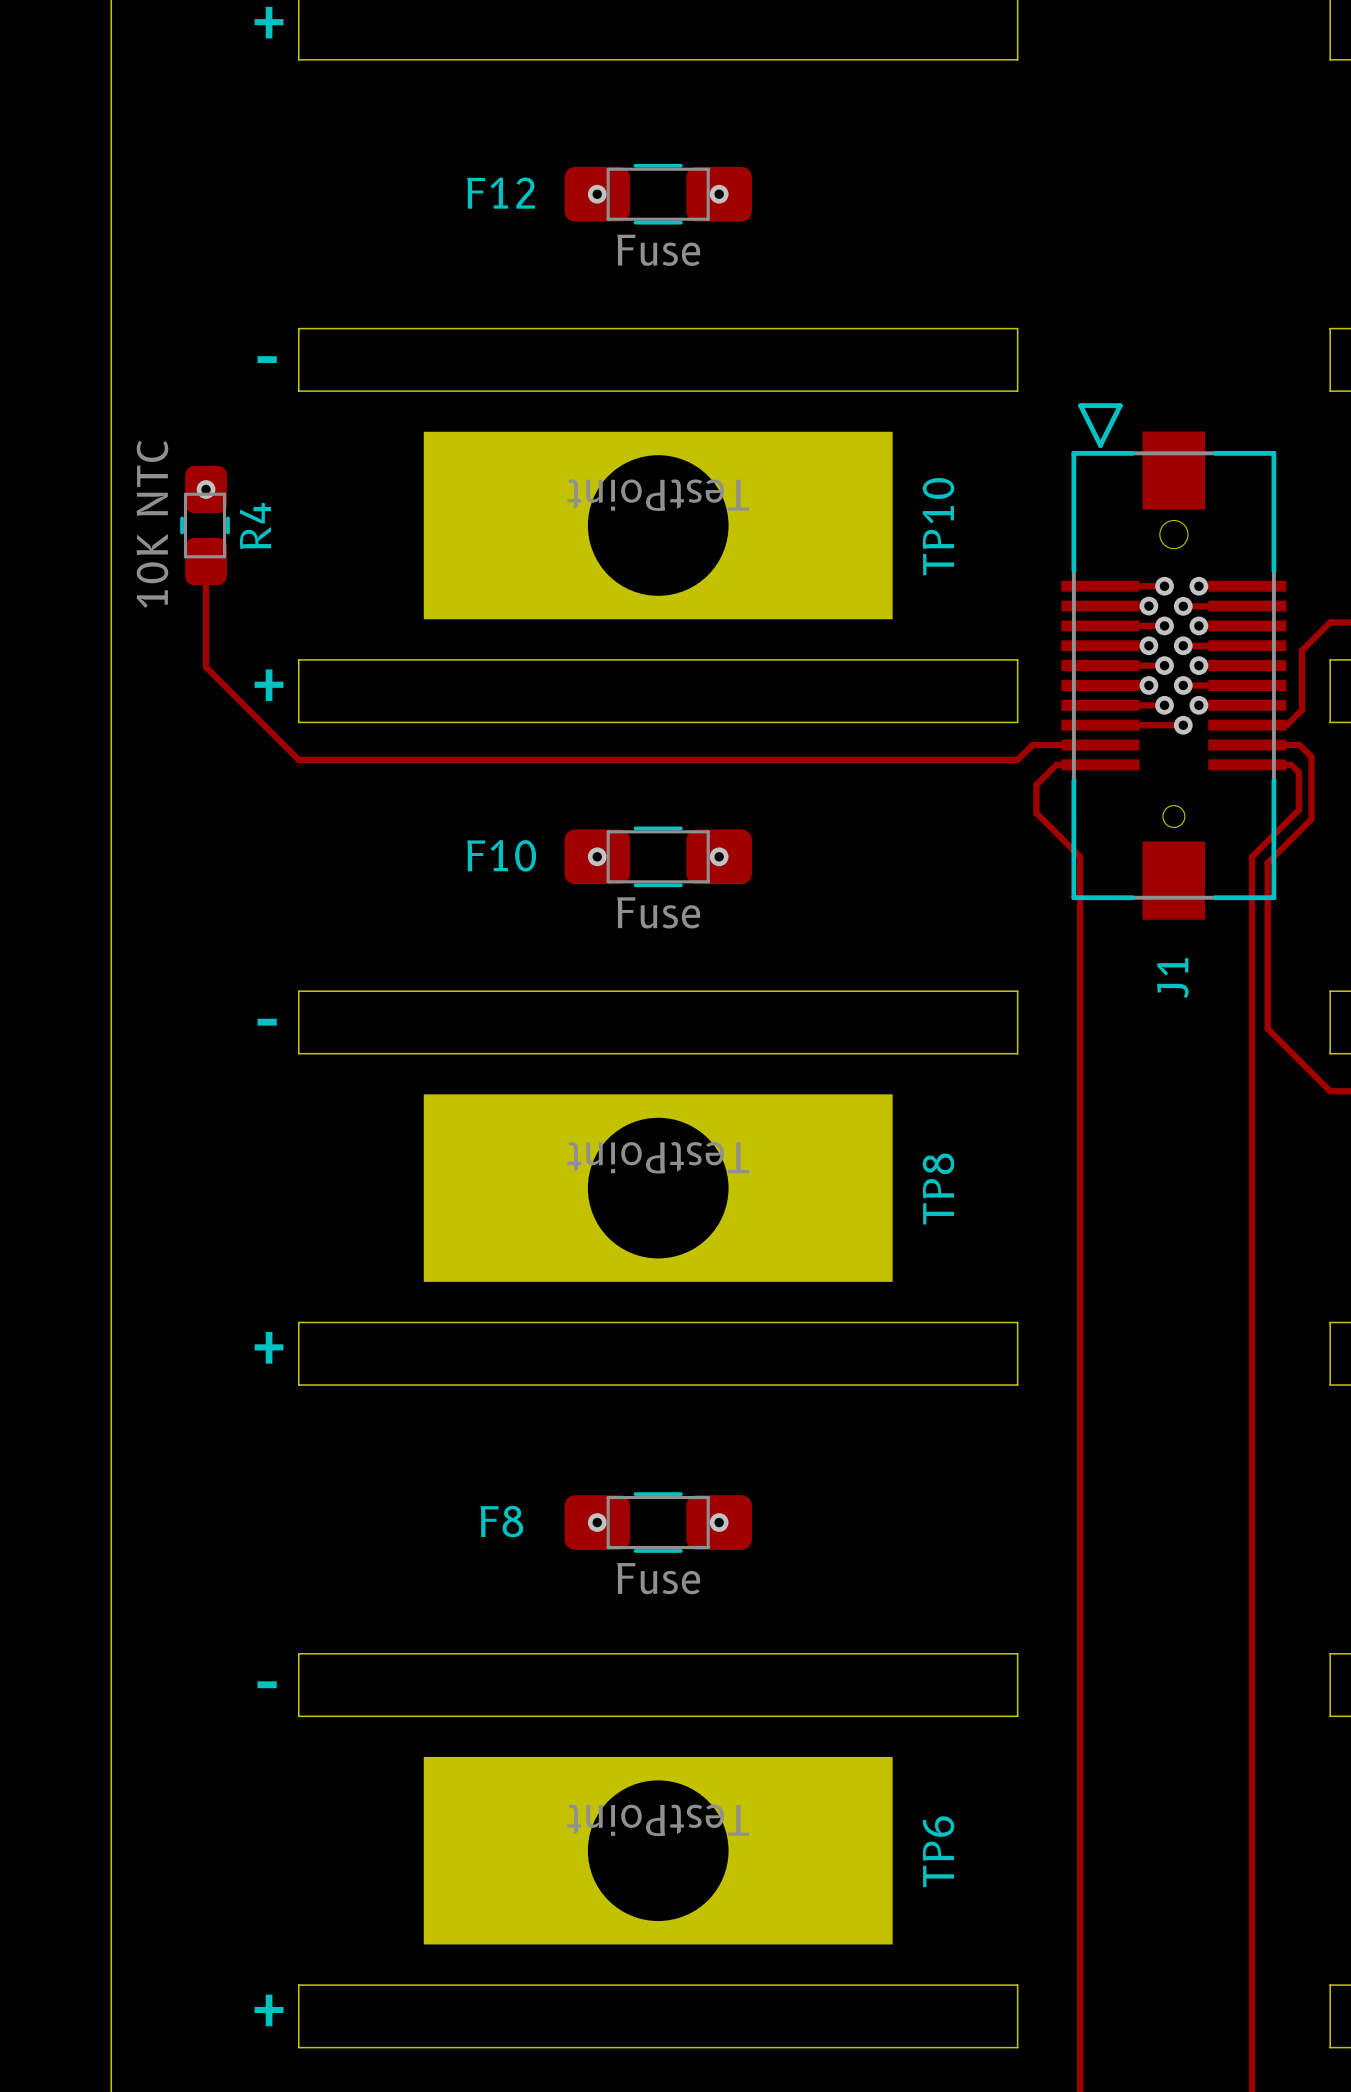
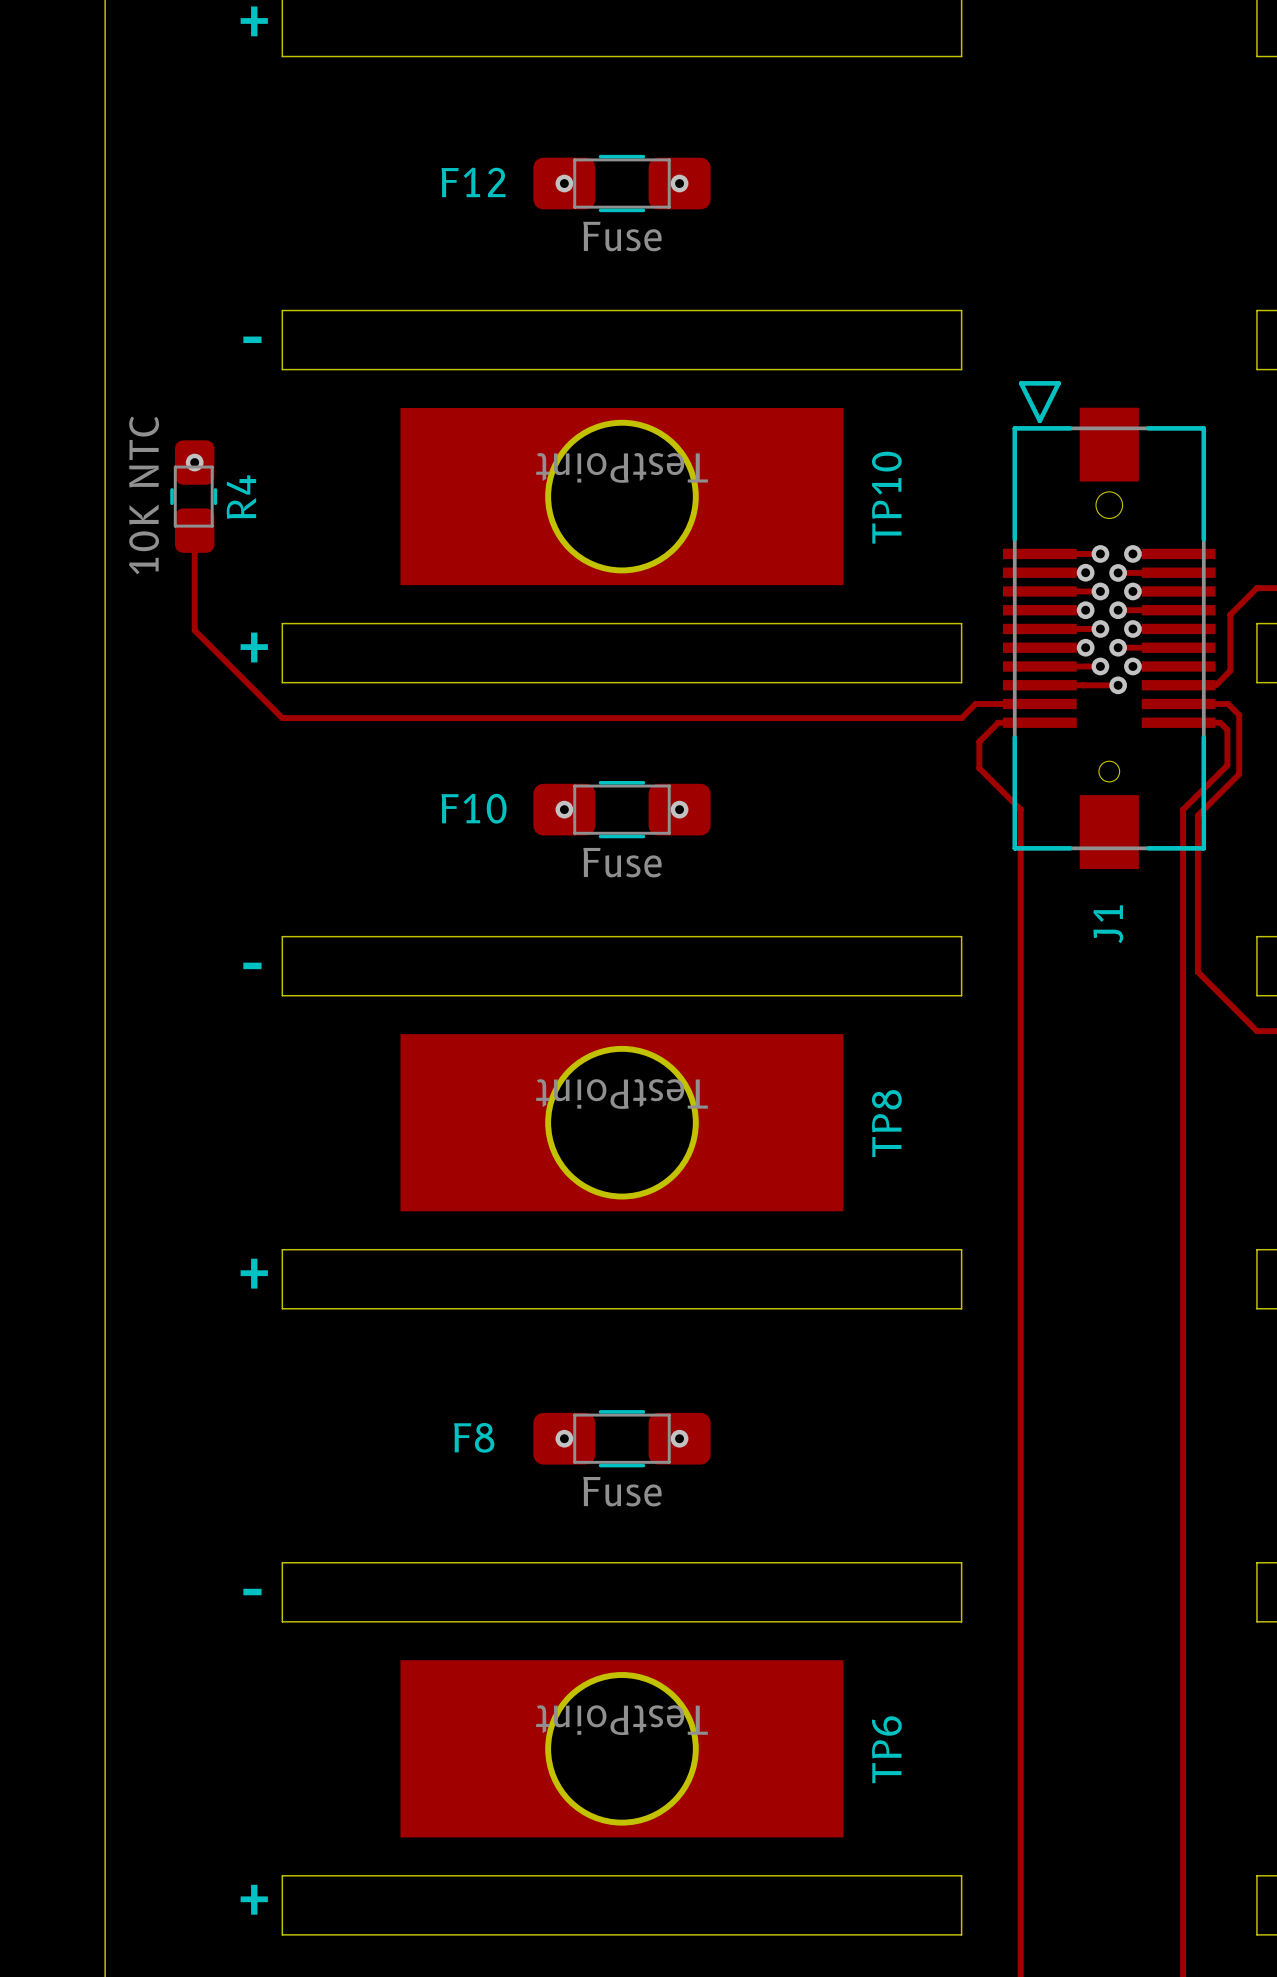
TP10 footprint: [423, 431, 893, 620] -> [400, 407, 844, 586]
TP8 footprint: [423, 1094, 893, 1282] -> [400, 1034, 844, 1212]
TP6 footprint: [423, 1756, 893, 1945] -> [400, 1660, 844, 1838]

